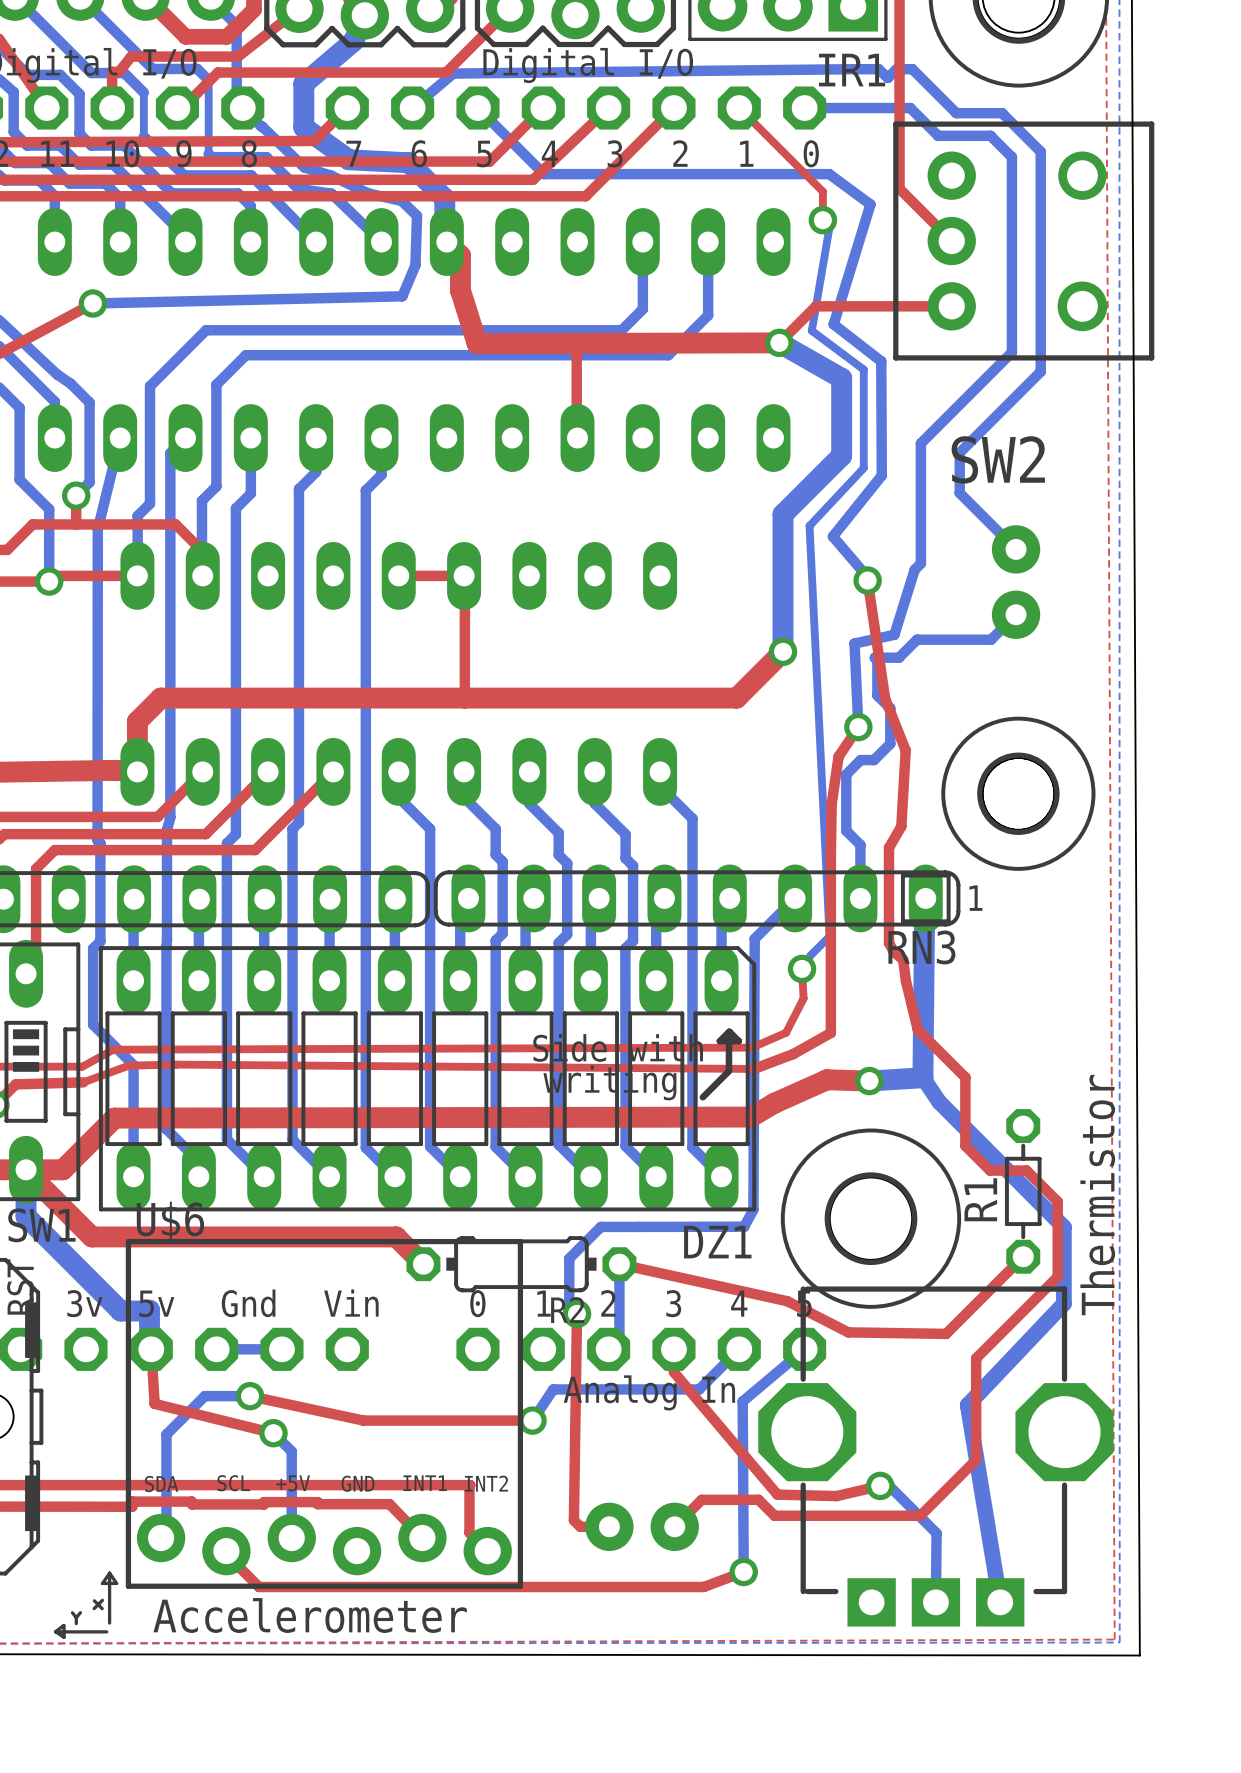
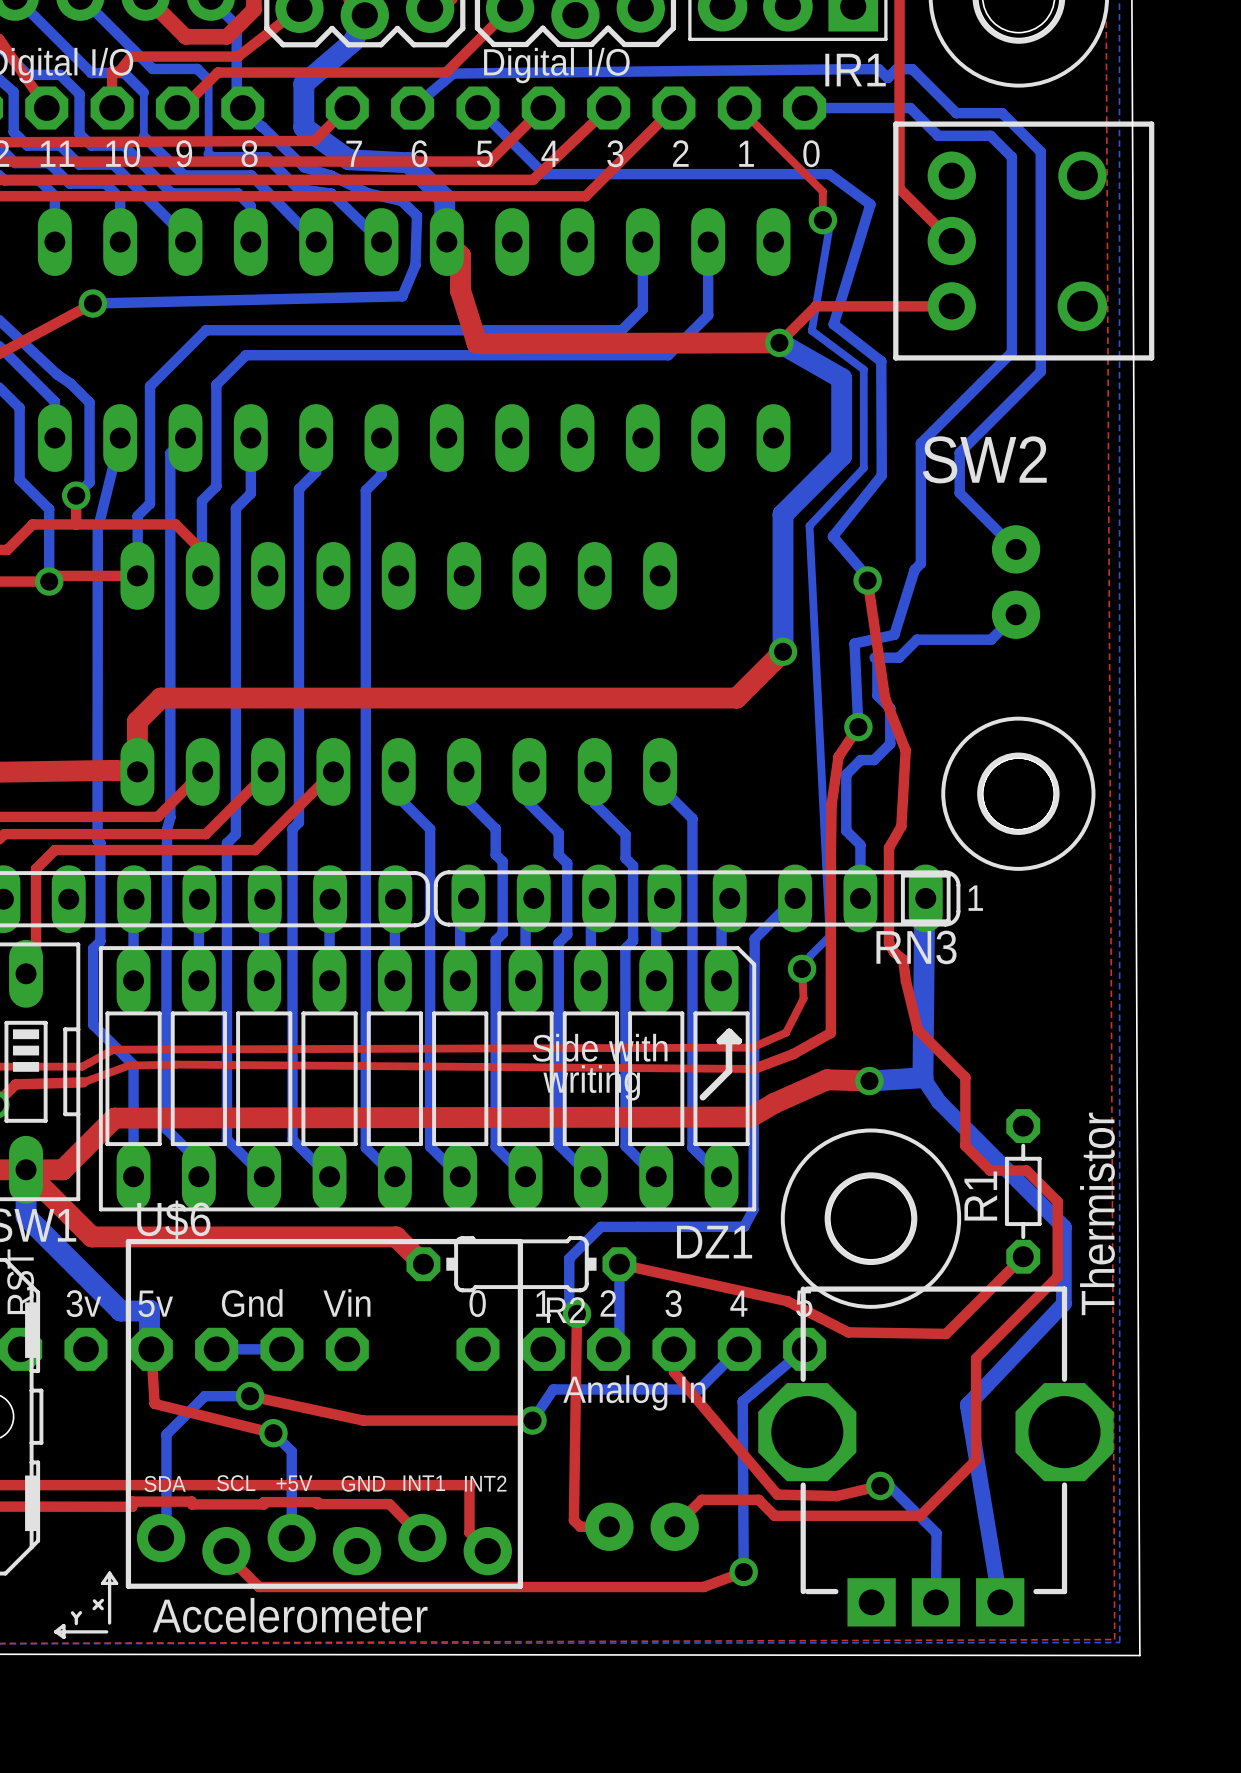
top track: (576, 343) (577, 438) -> none
top track: (398, 575) (464, 575) (464, 698) -> none

